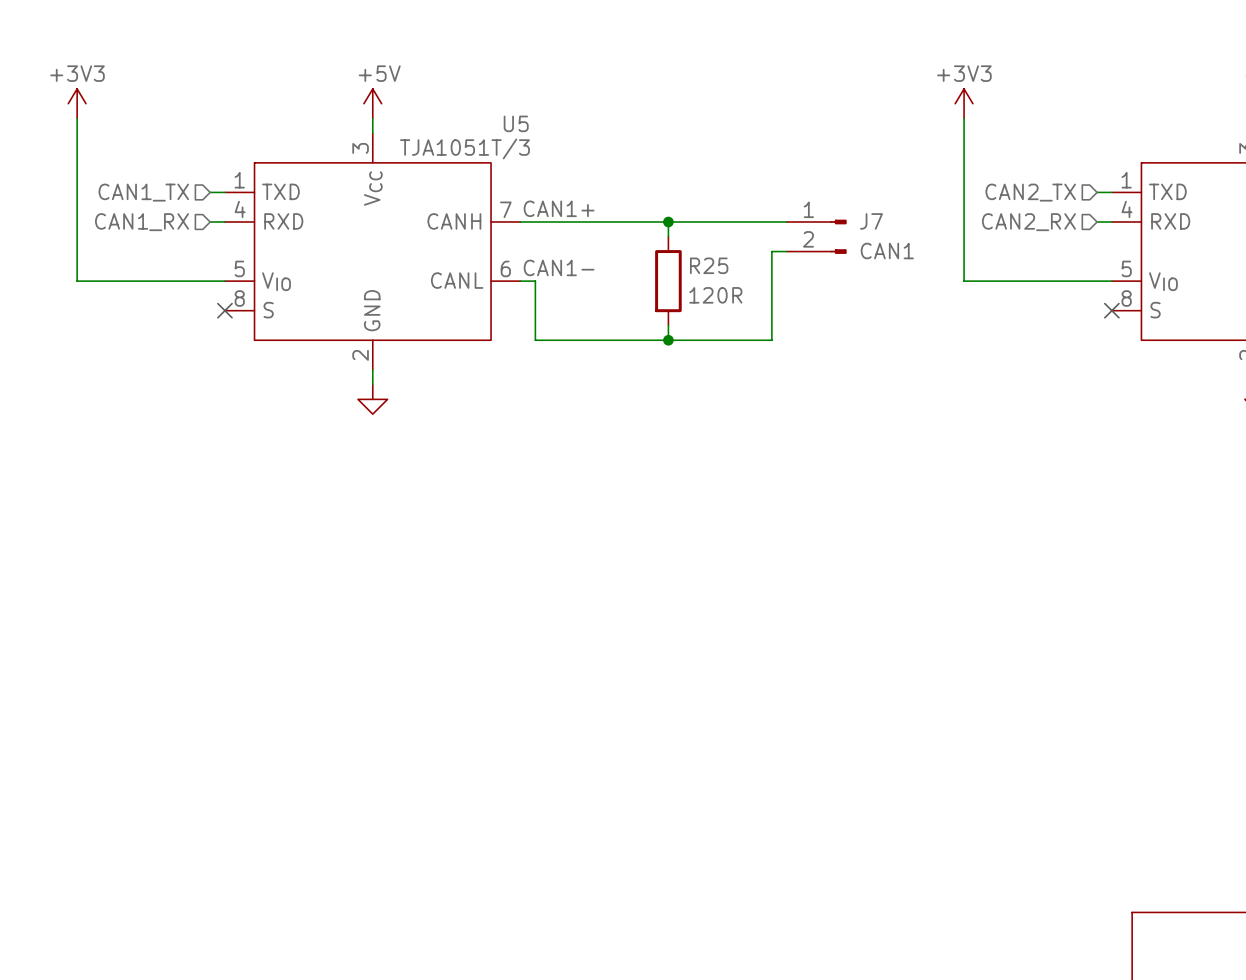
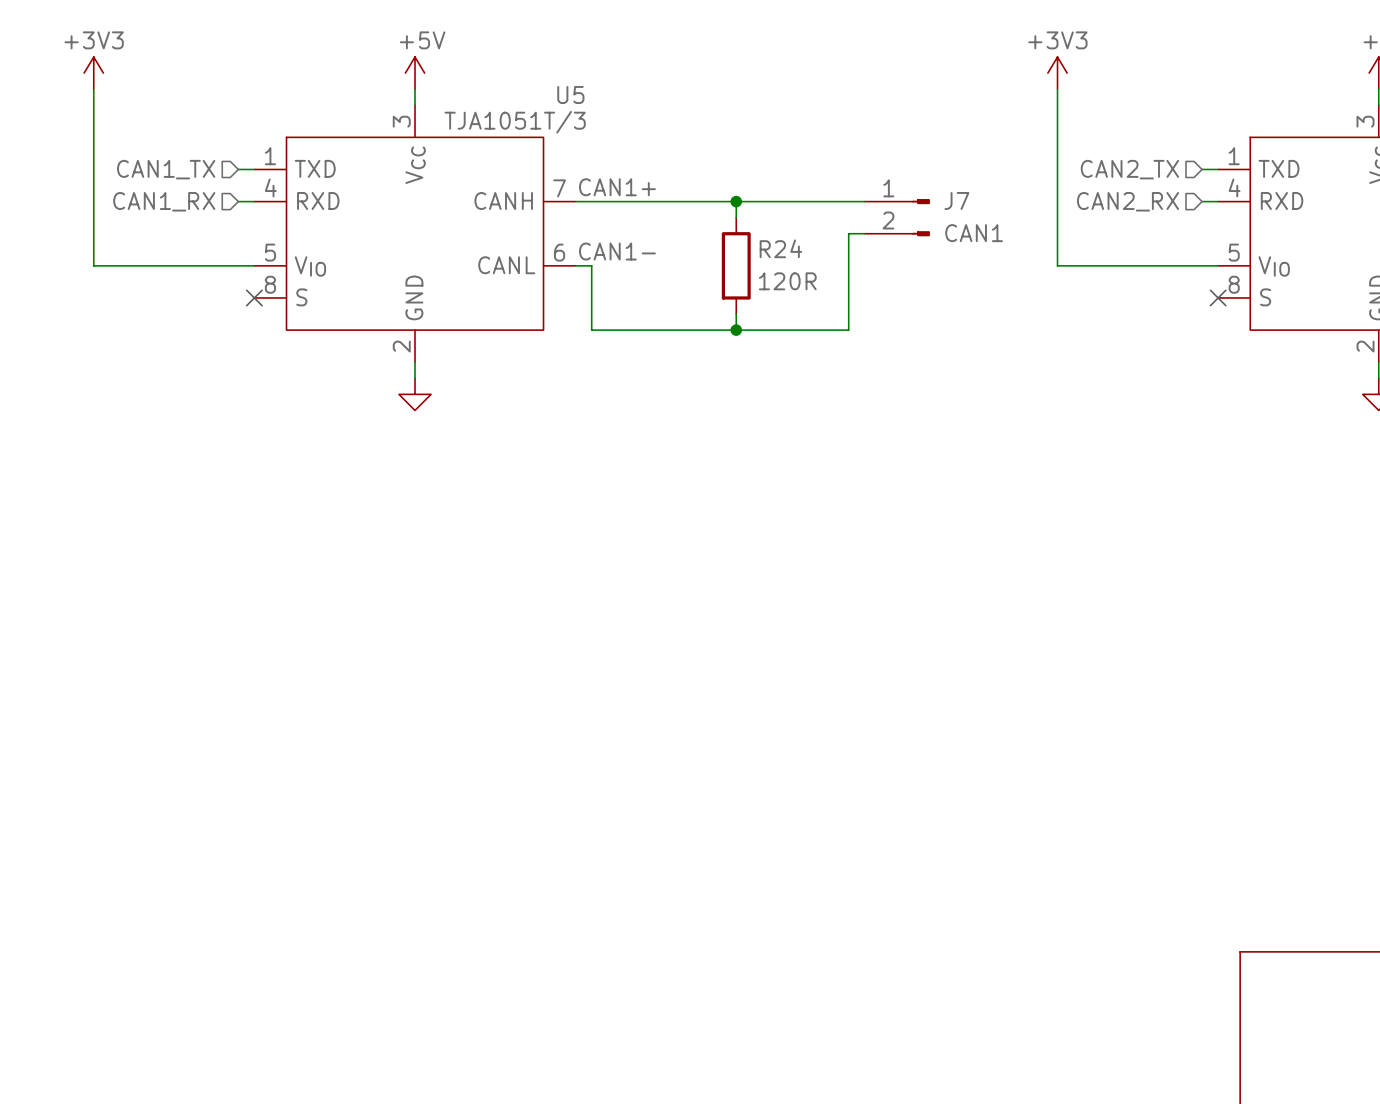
R25 name: R25 (709, 265) -> R24 (780, 248)

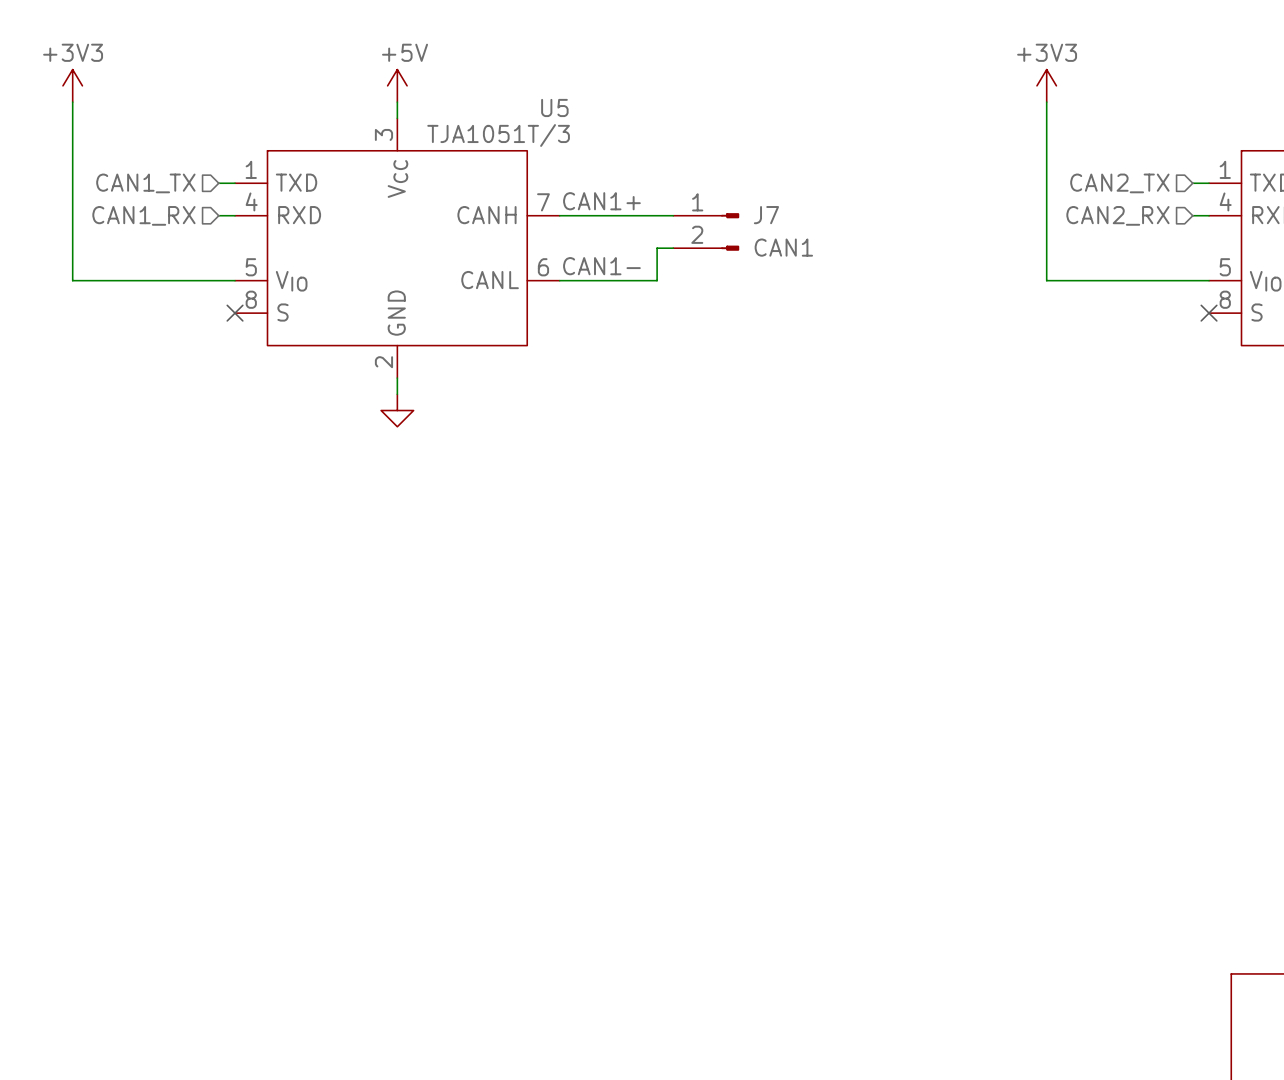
wire: (688, 201) (864, 201) -> none
wire: (736, 201) (736, 217) -> none
junction: (736, 201) -> none
J7 position: (897, 217) -> (706, 231)
wire: (864, 233) (848, 233) (848, 330) (591, 330) (591, 265) -> (673, 248) (657, 248) (657, 280) (575, 280)
R24: 120R (736, 265) -> none
wire: (736, 314) (736, 330) -> none
junction: (736, 330) -> none

